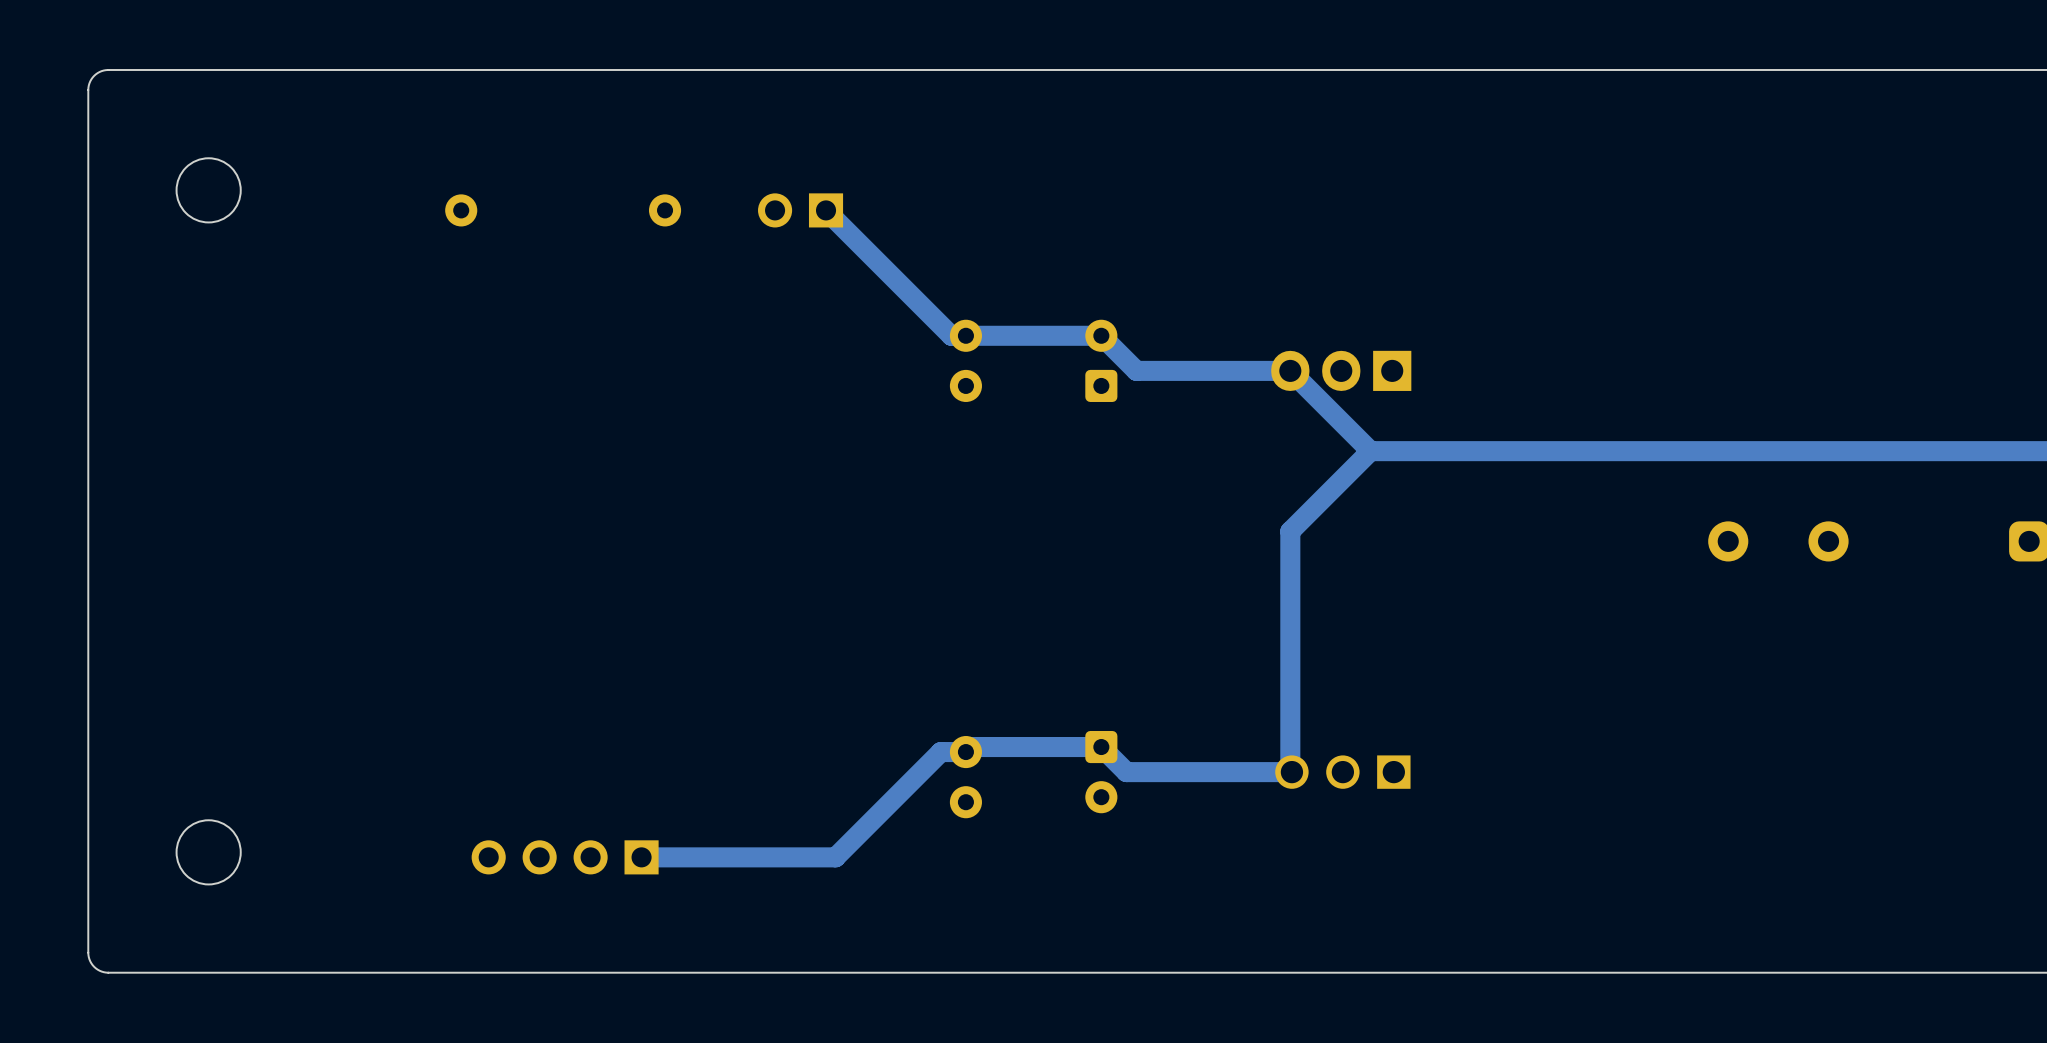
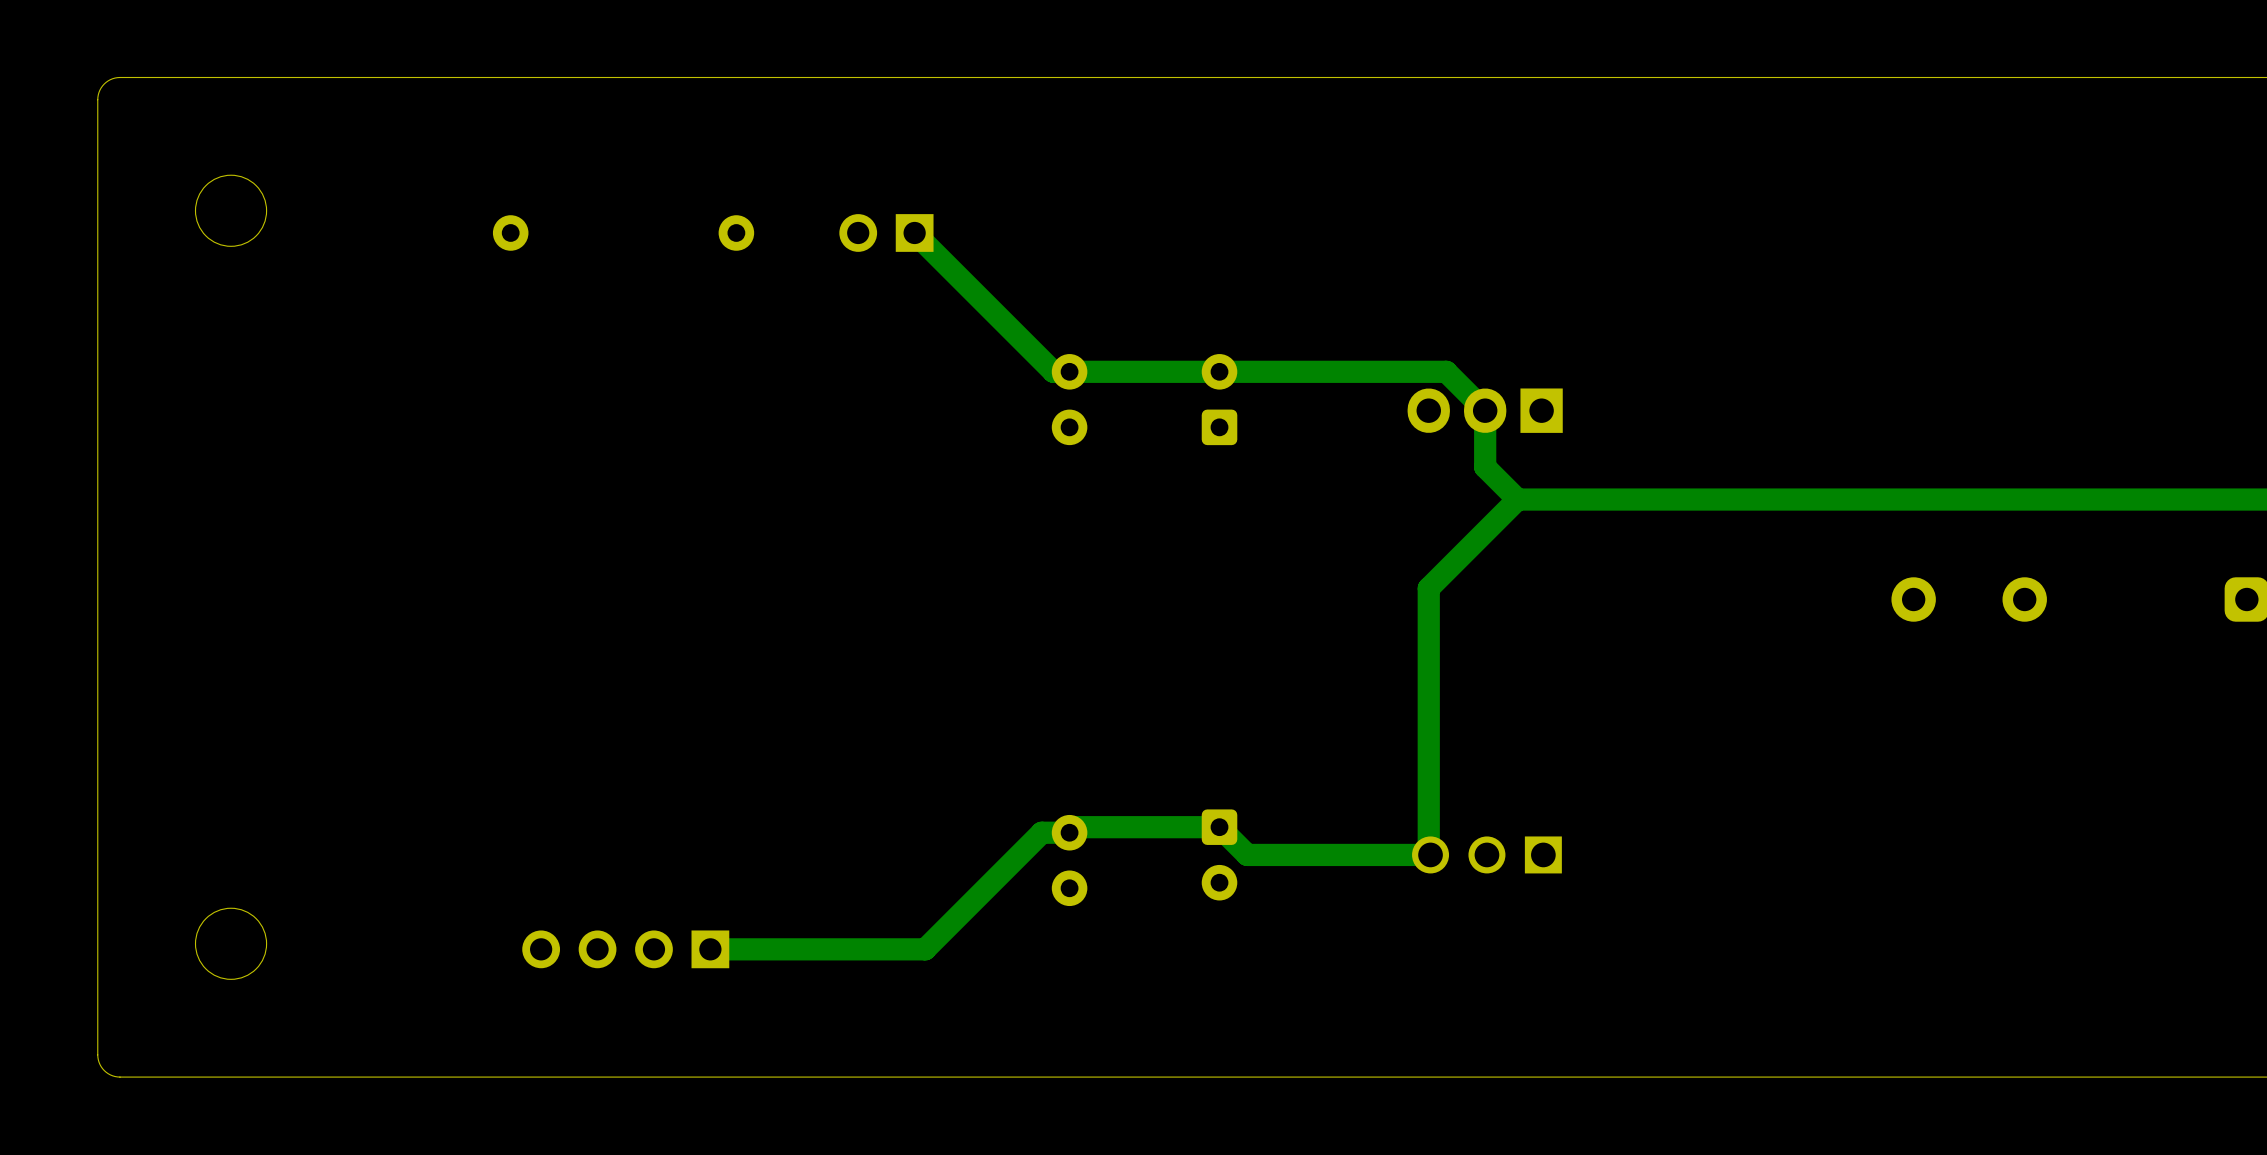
track: (1101, 335) (1136, 370) (1290, 370) (1341, 421) -> (1219, 371) (1446, 371) (1485, 410) (1485, 467)

